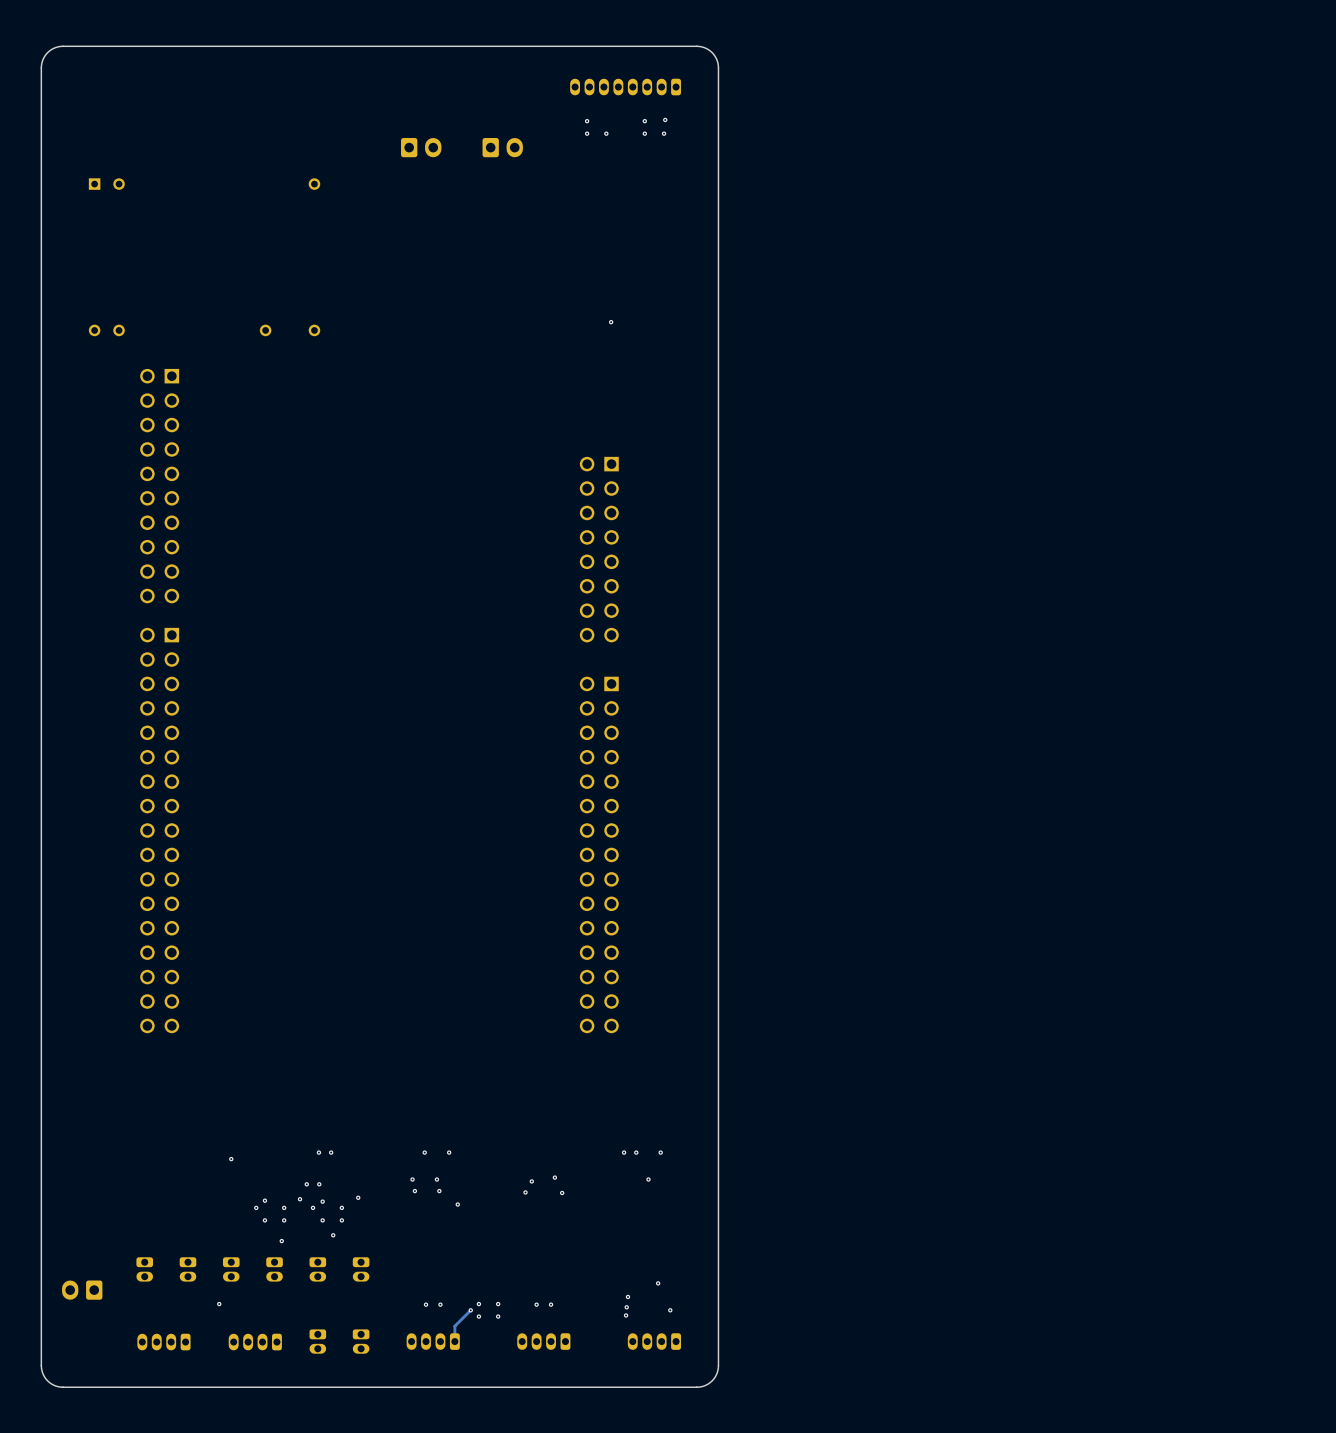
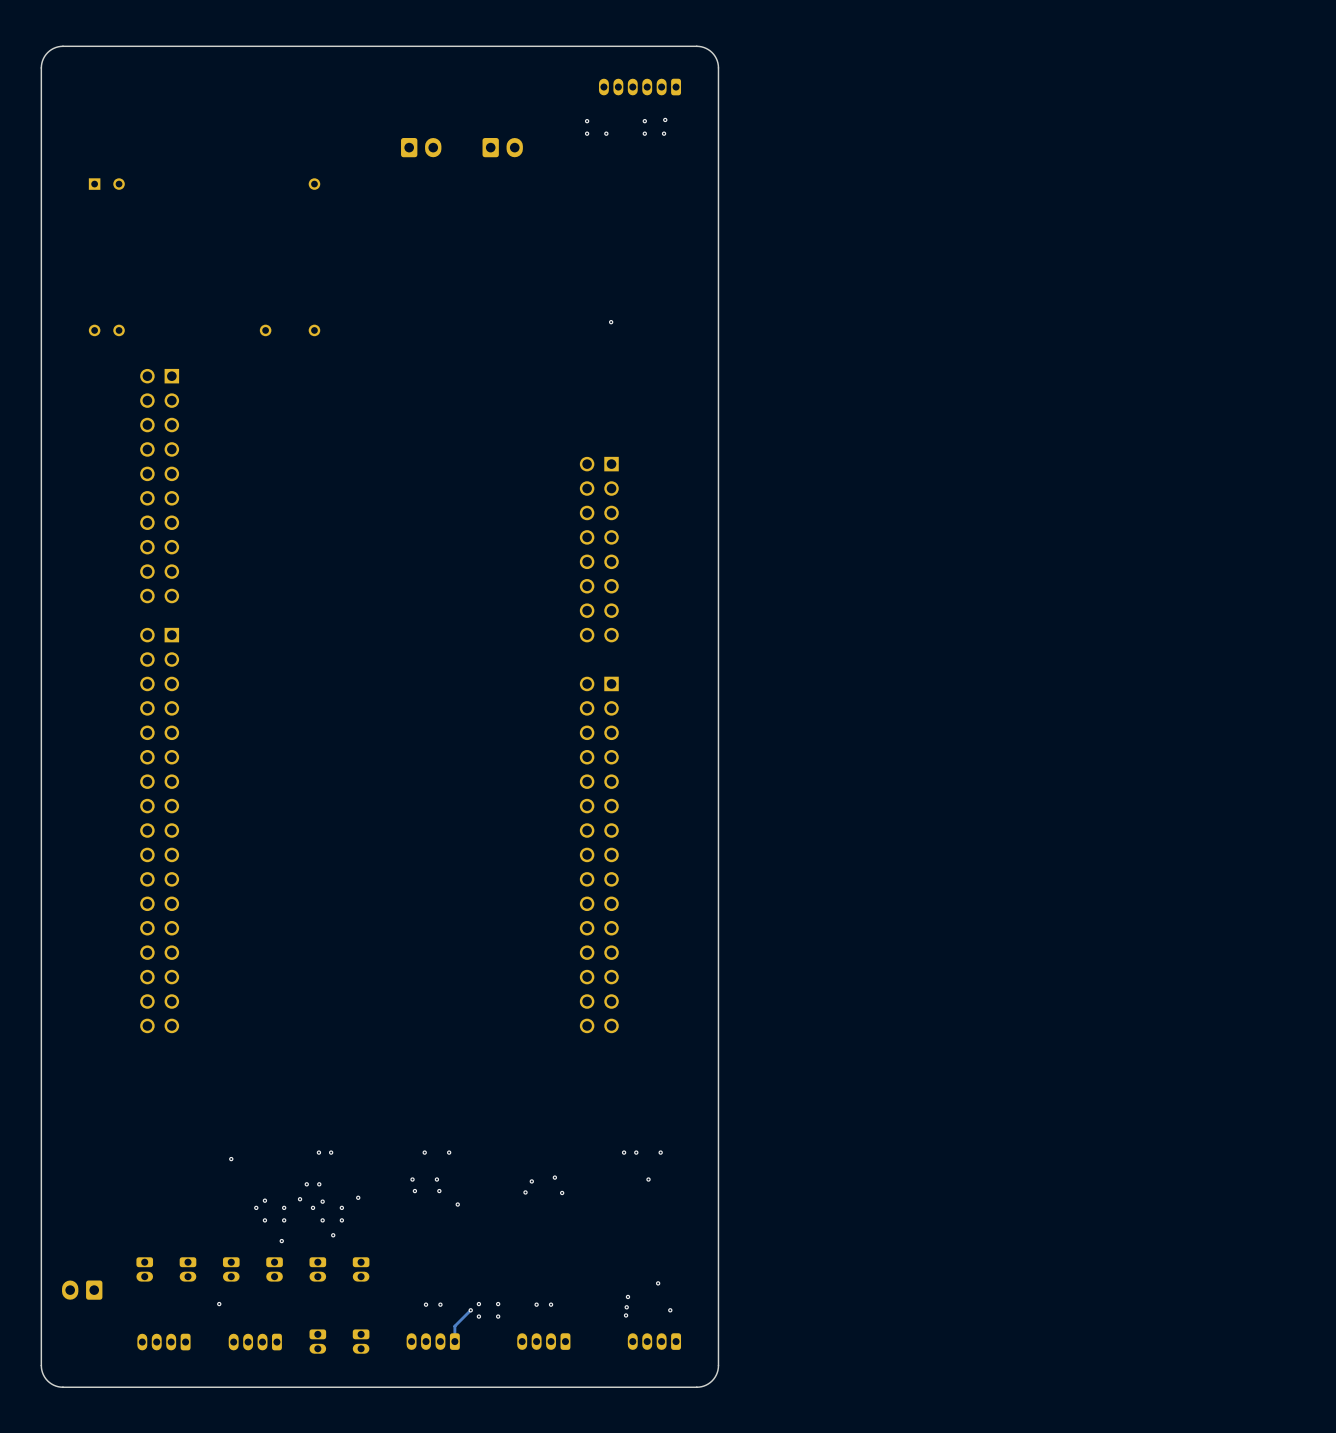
part: (625, 87) -> none

